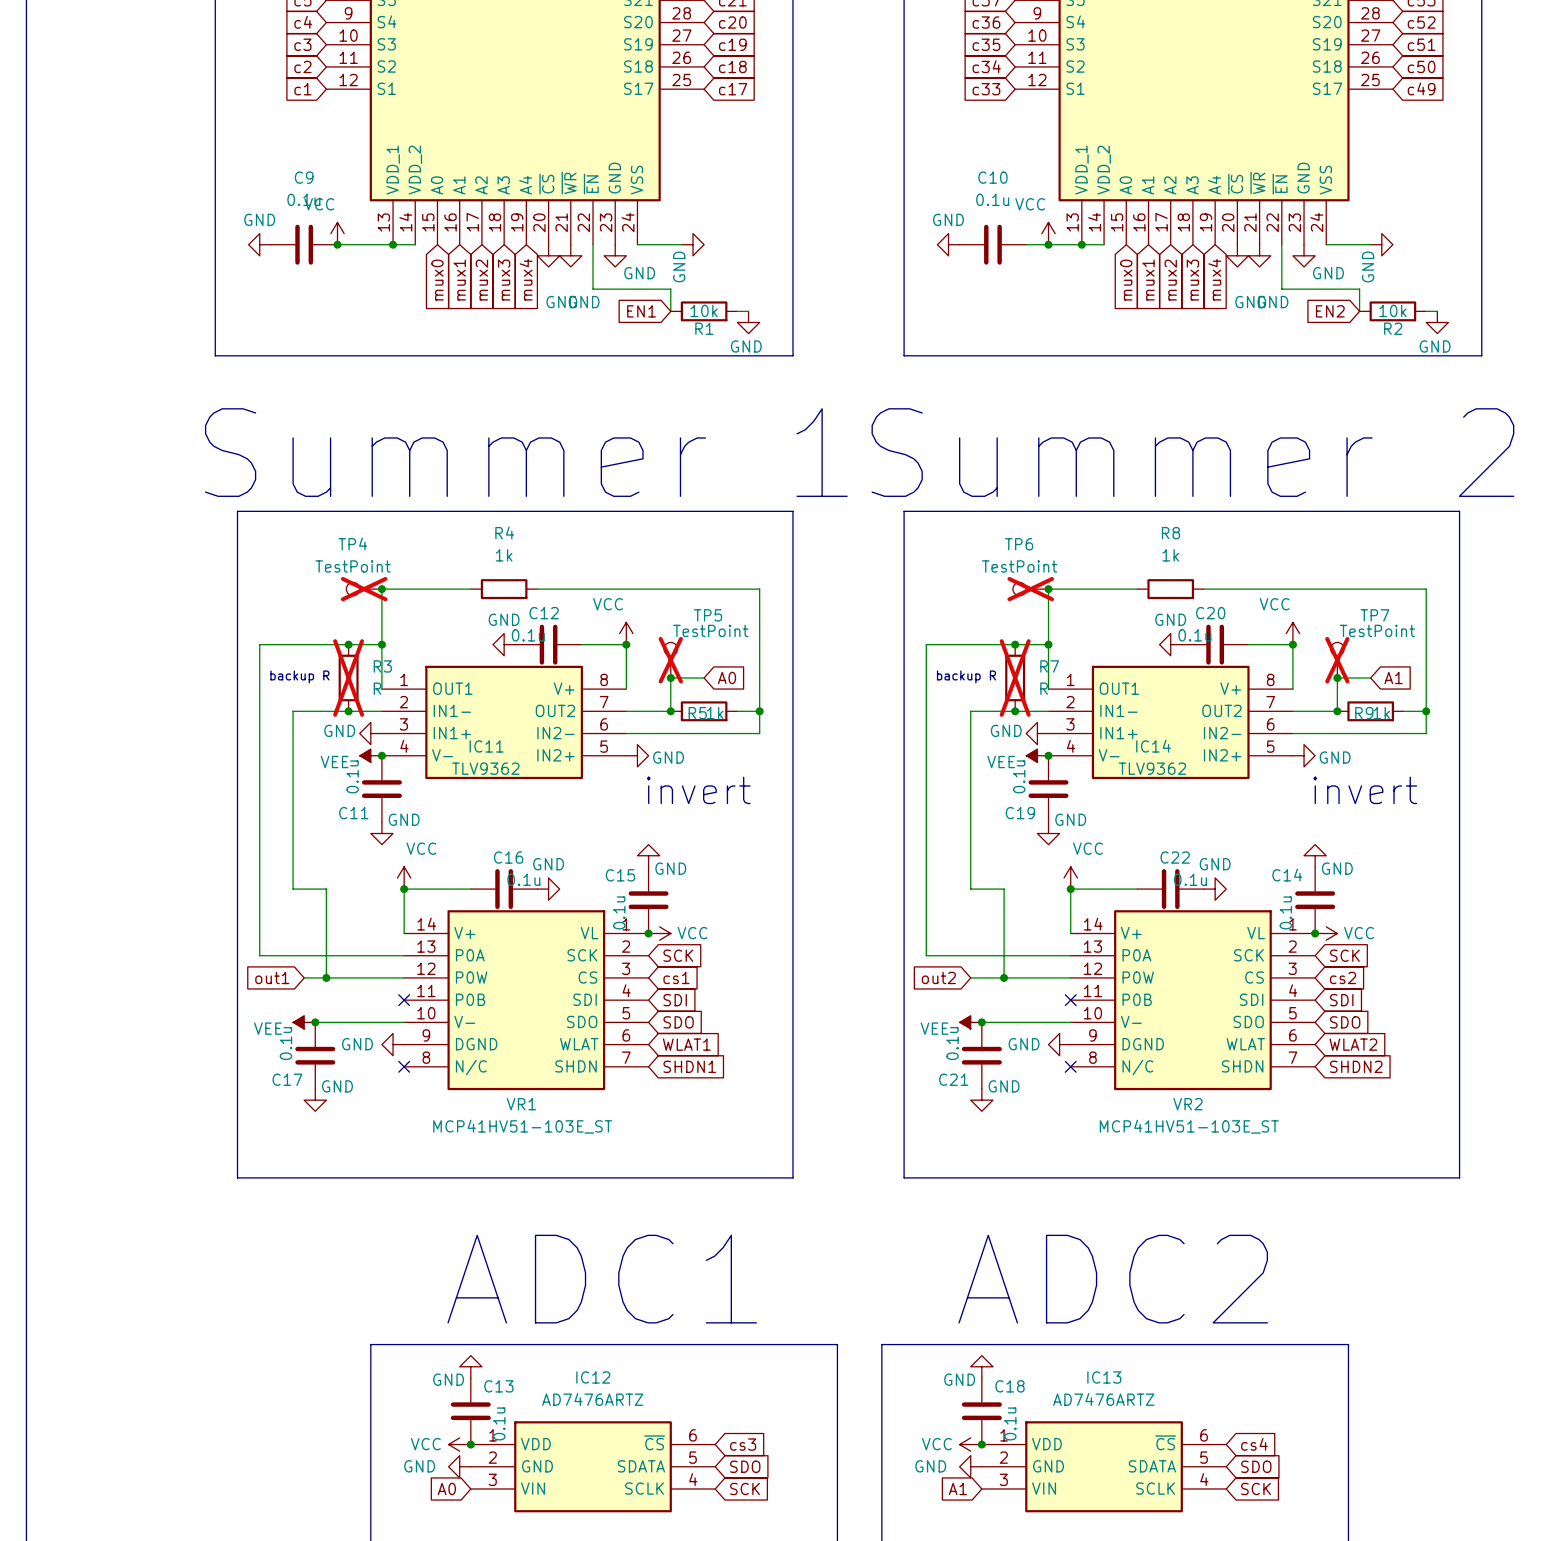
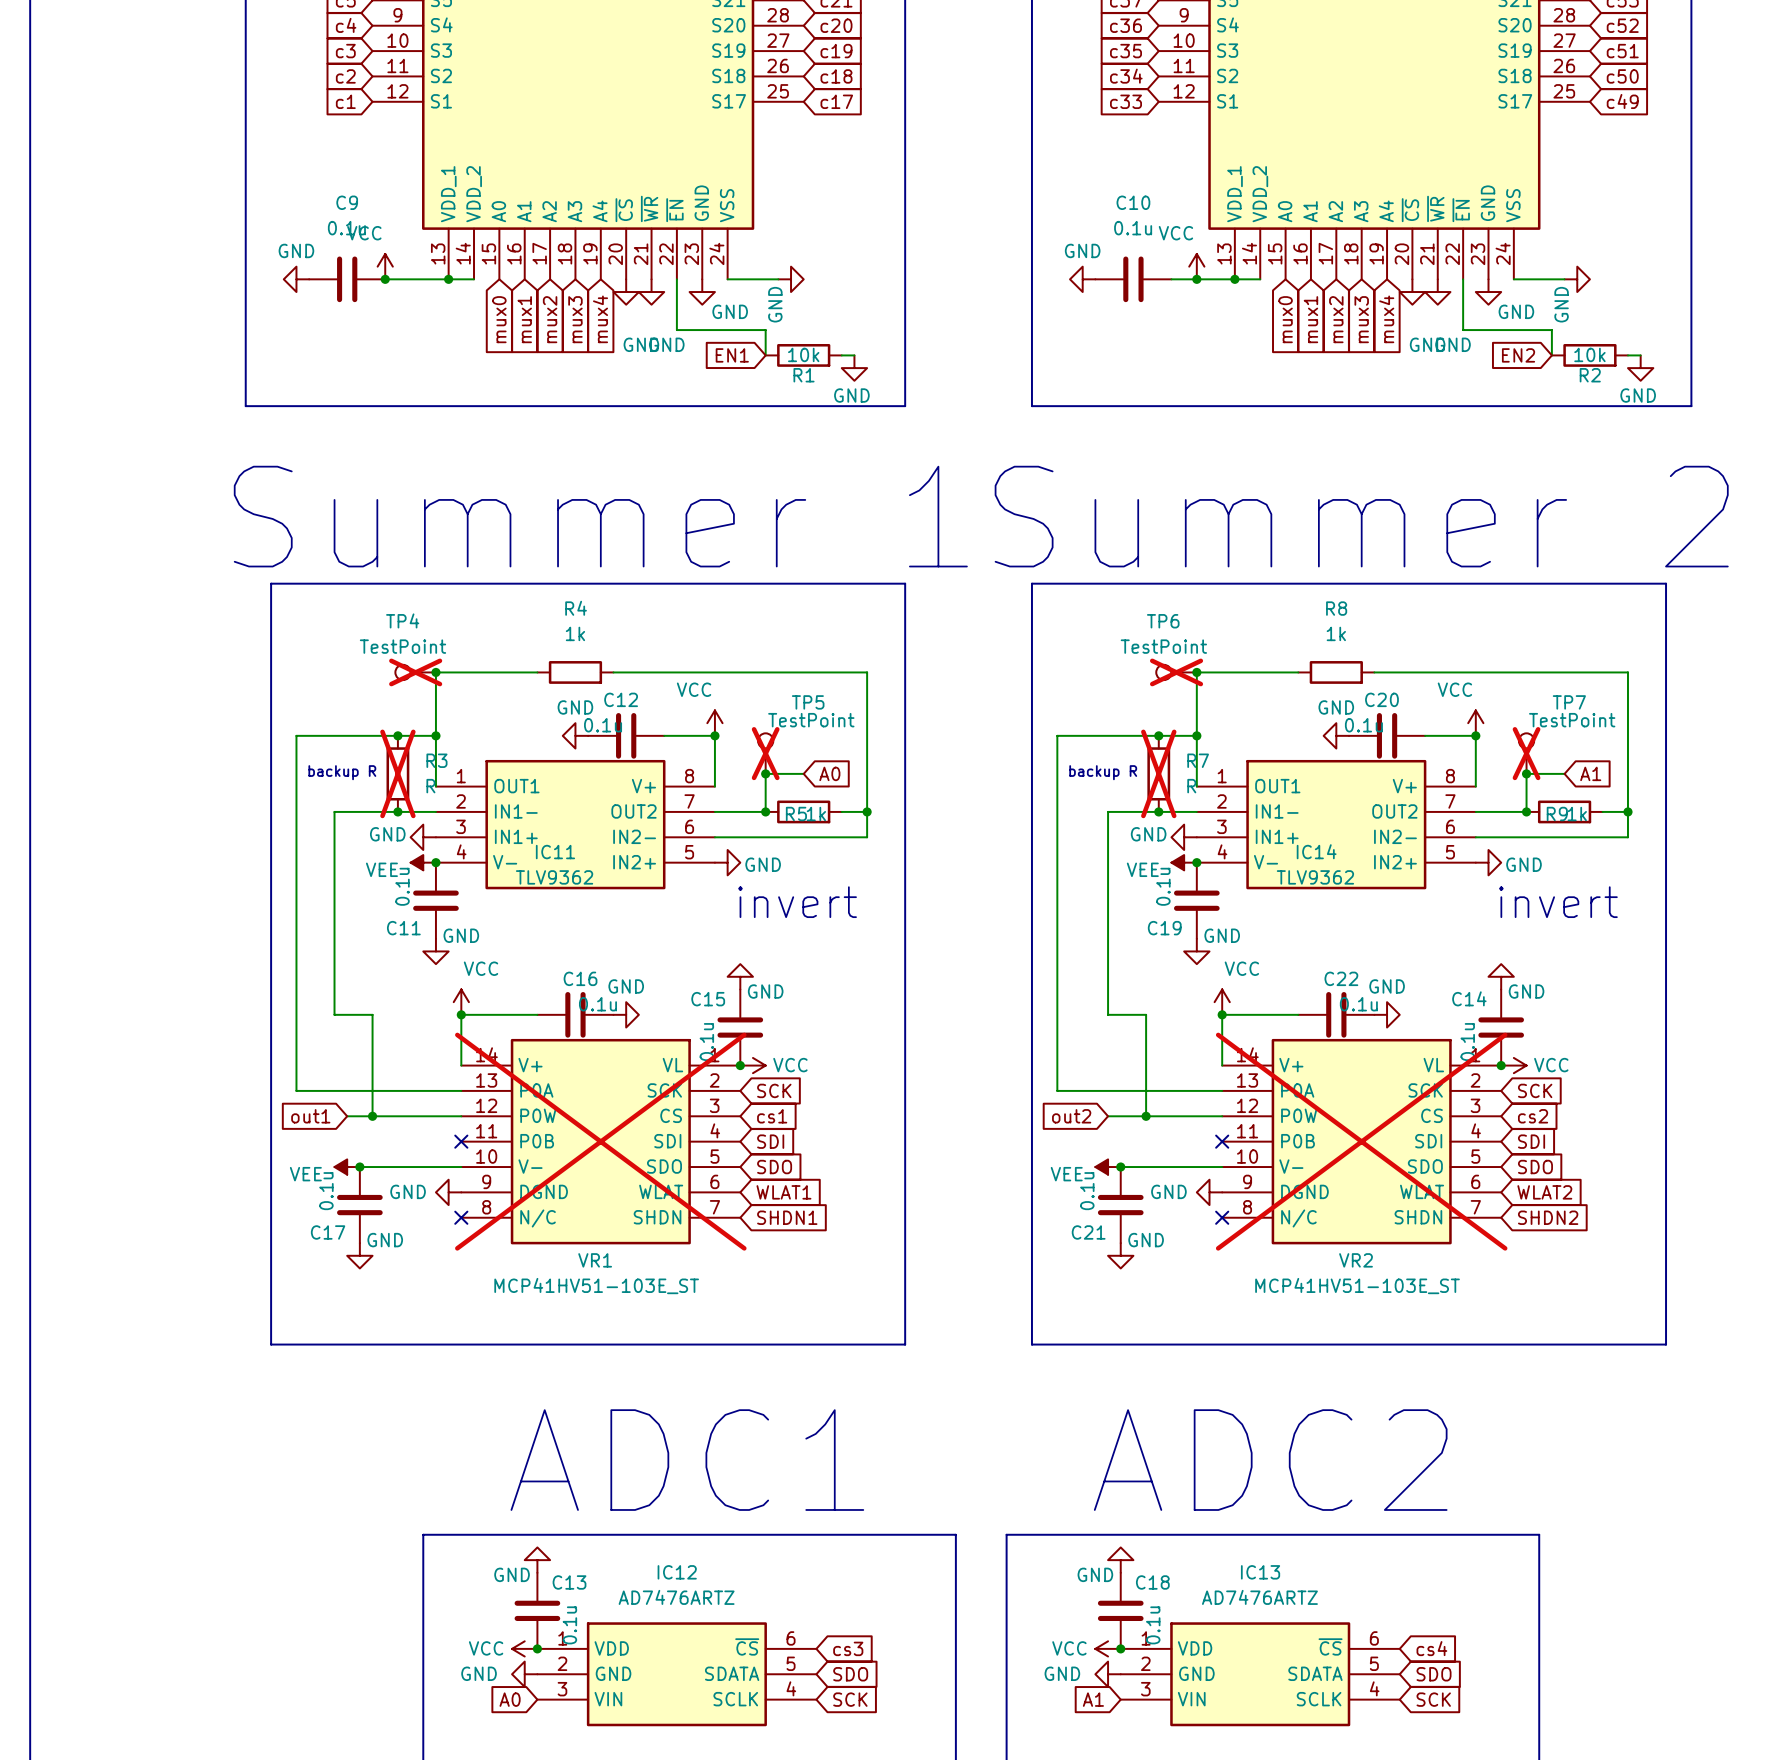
VR1 do-not-place cross: none -> (600, 1141)
VR2 do-not-place cross: none -> (1361, 1141)

